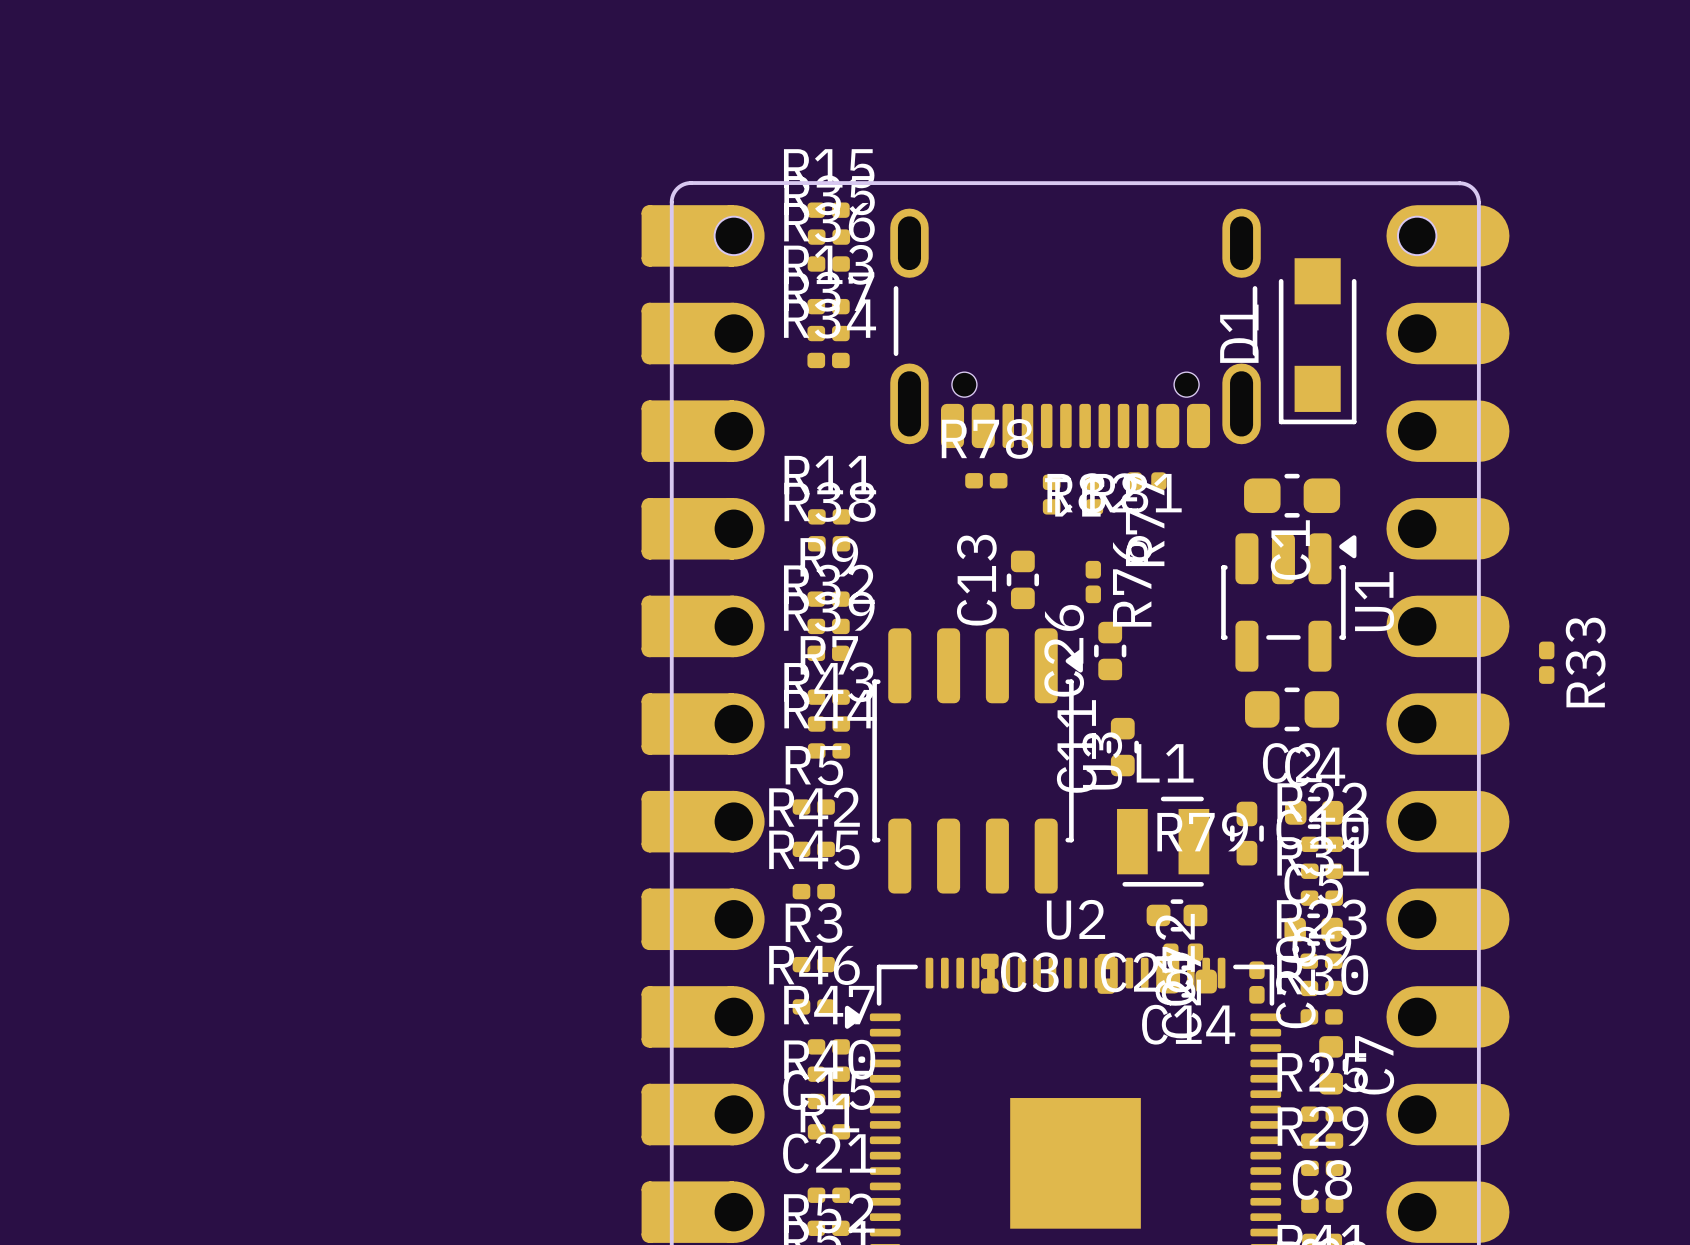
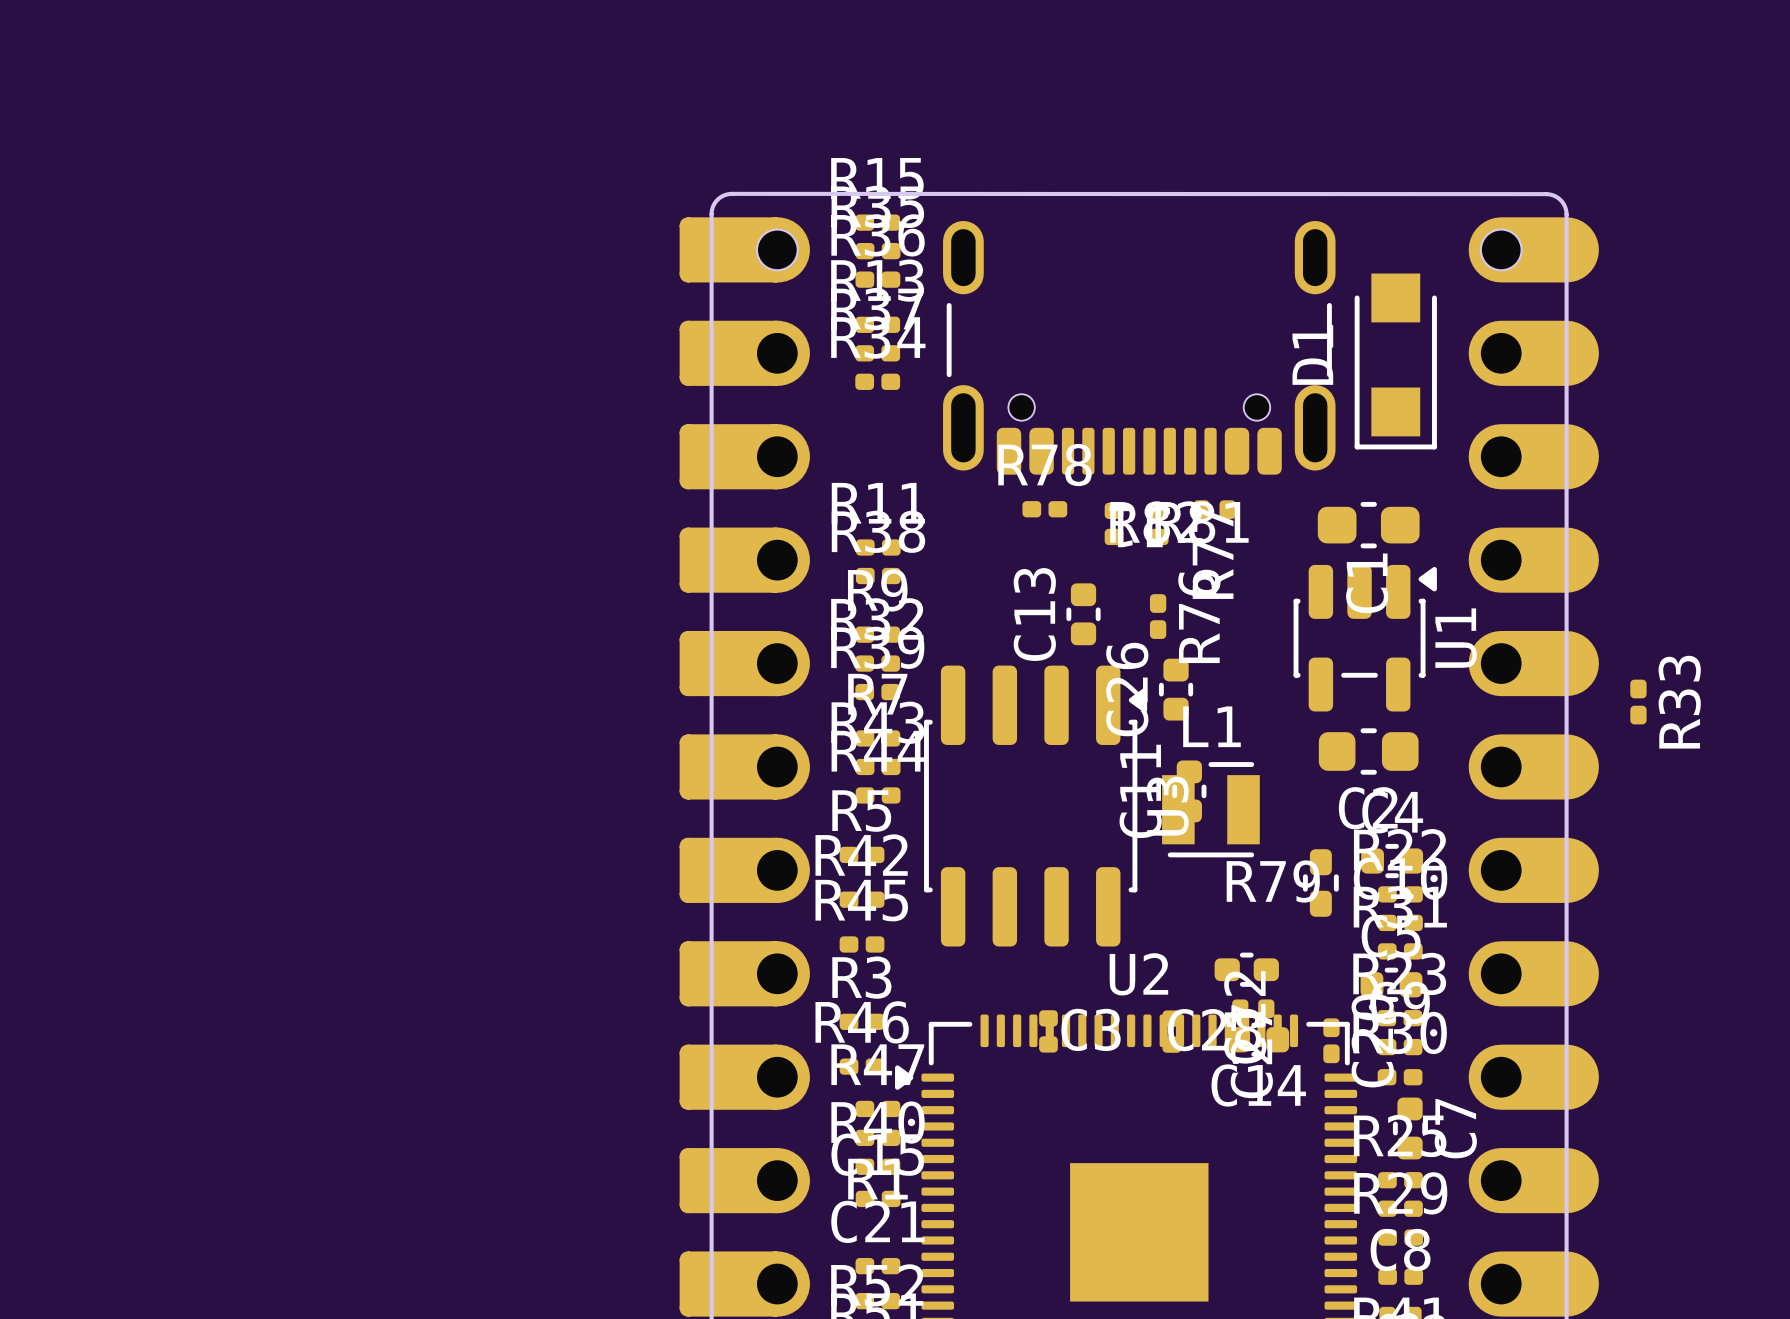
L1 position: (1163, 841) -> (1210, 809)

